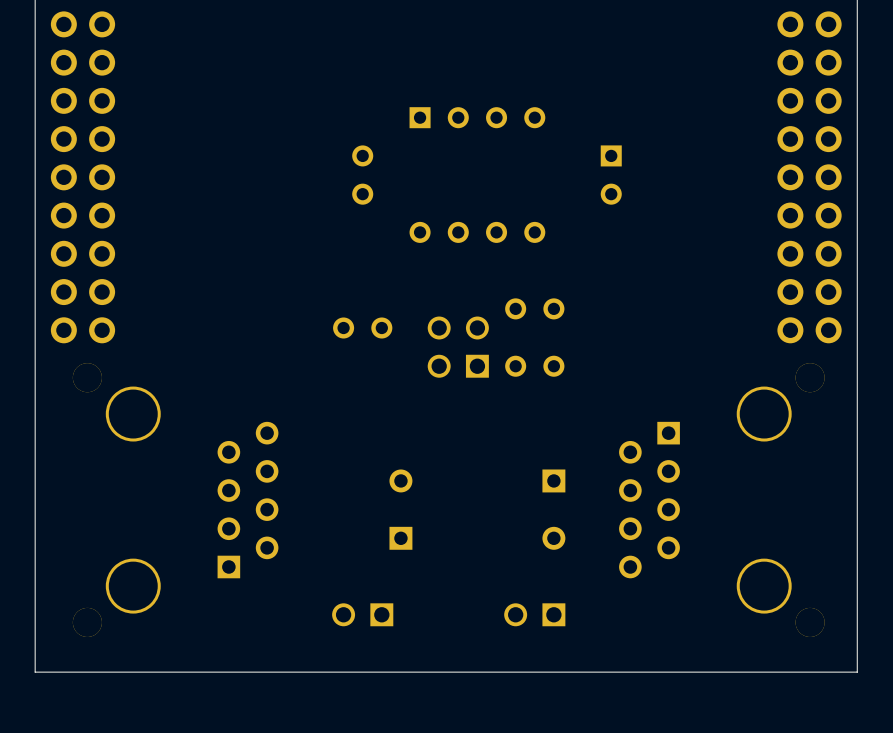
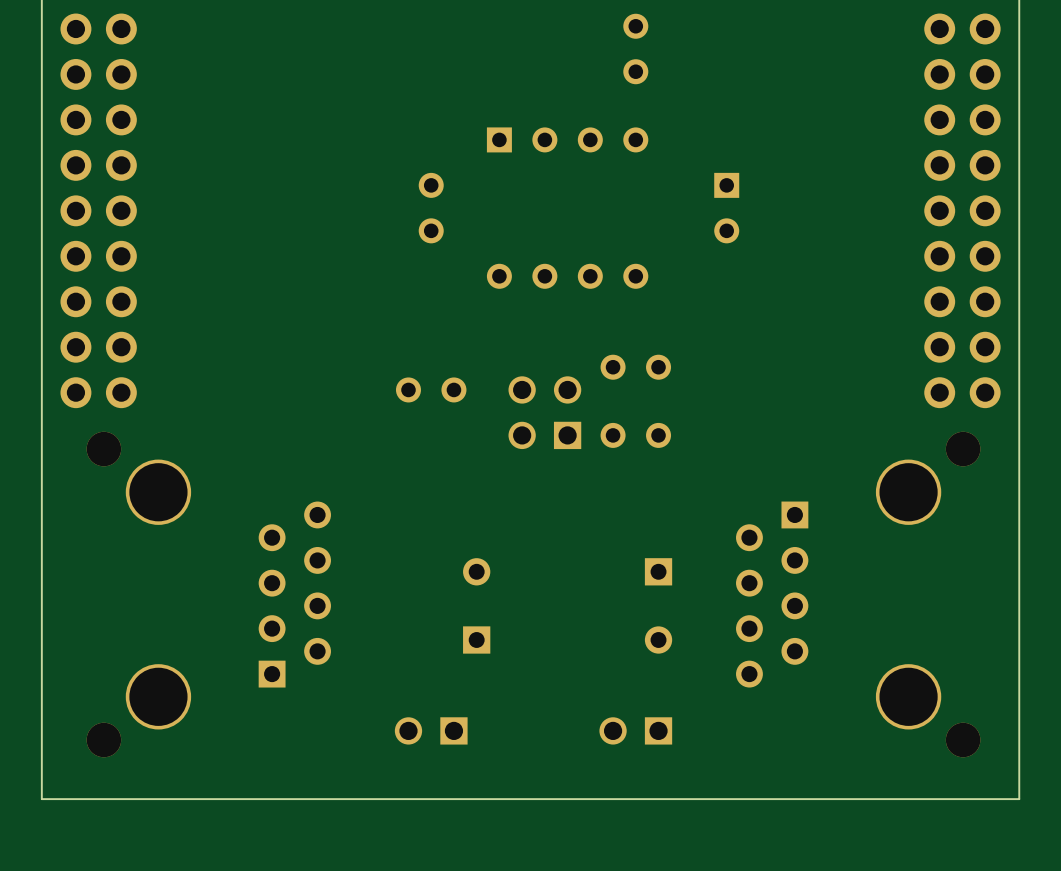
part: none -> (635, 48)

